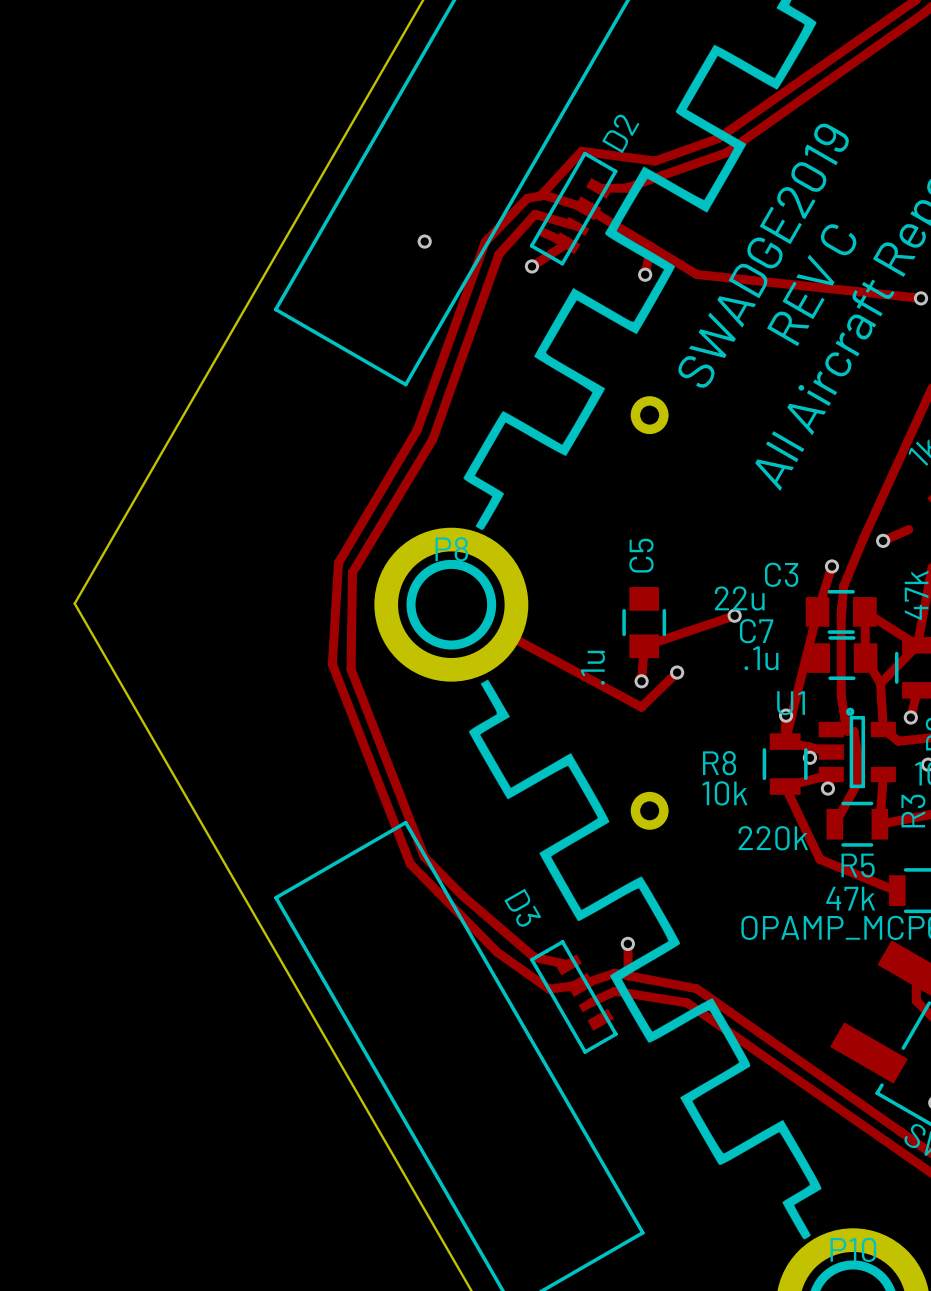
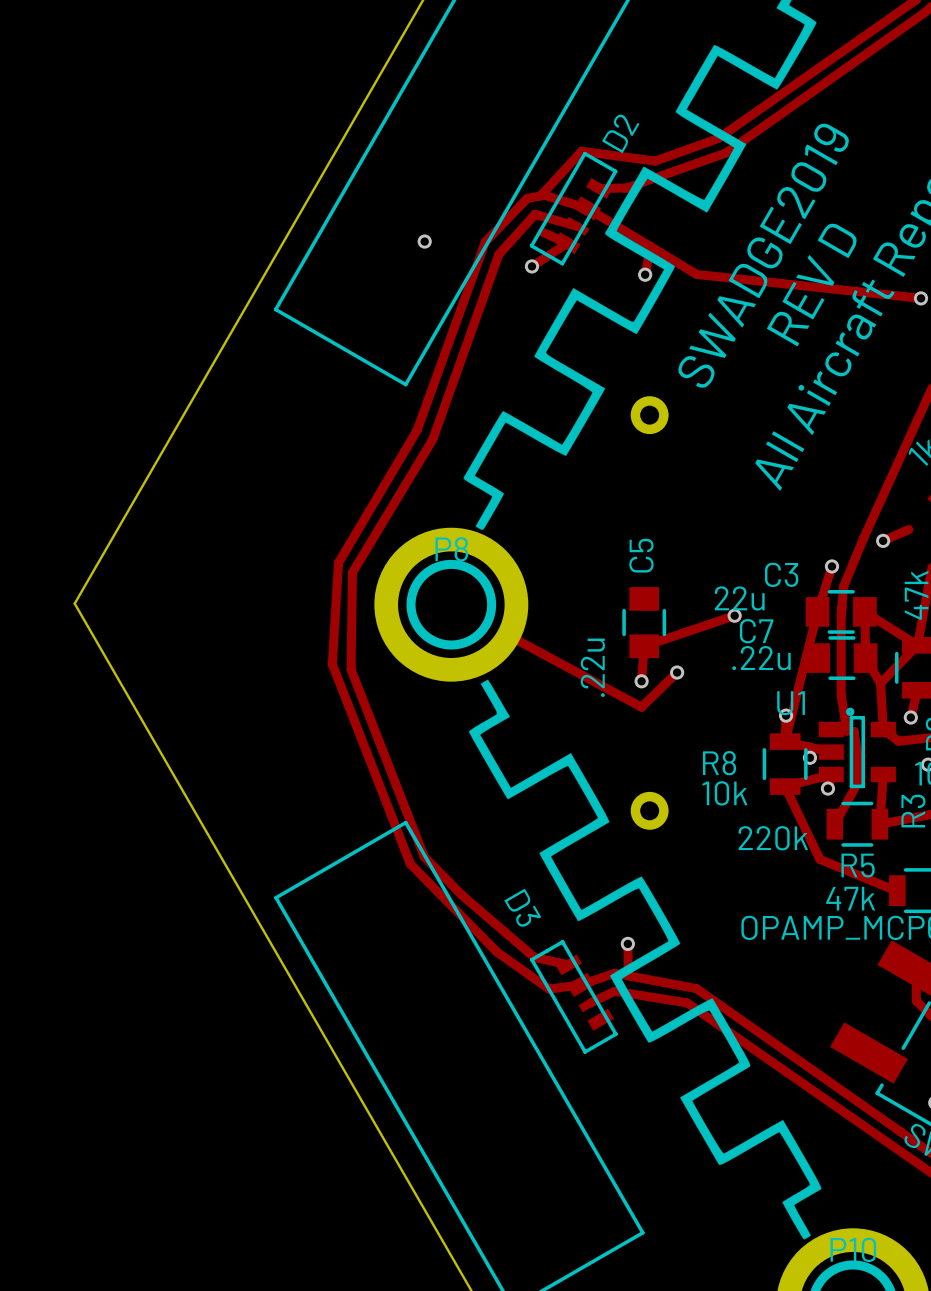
text: REV C (811, 285) -> REV D (812, 284)
C7 value: .1u (761, 658) -> .22u (761, 658)
C5 value: .1u (593, 667) -> .22u (592, 667)

